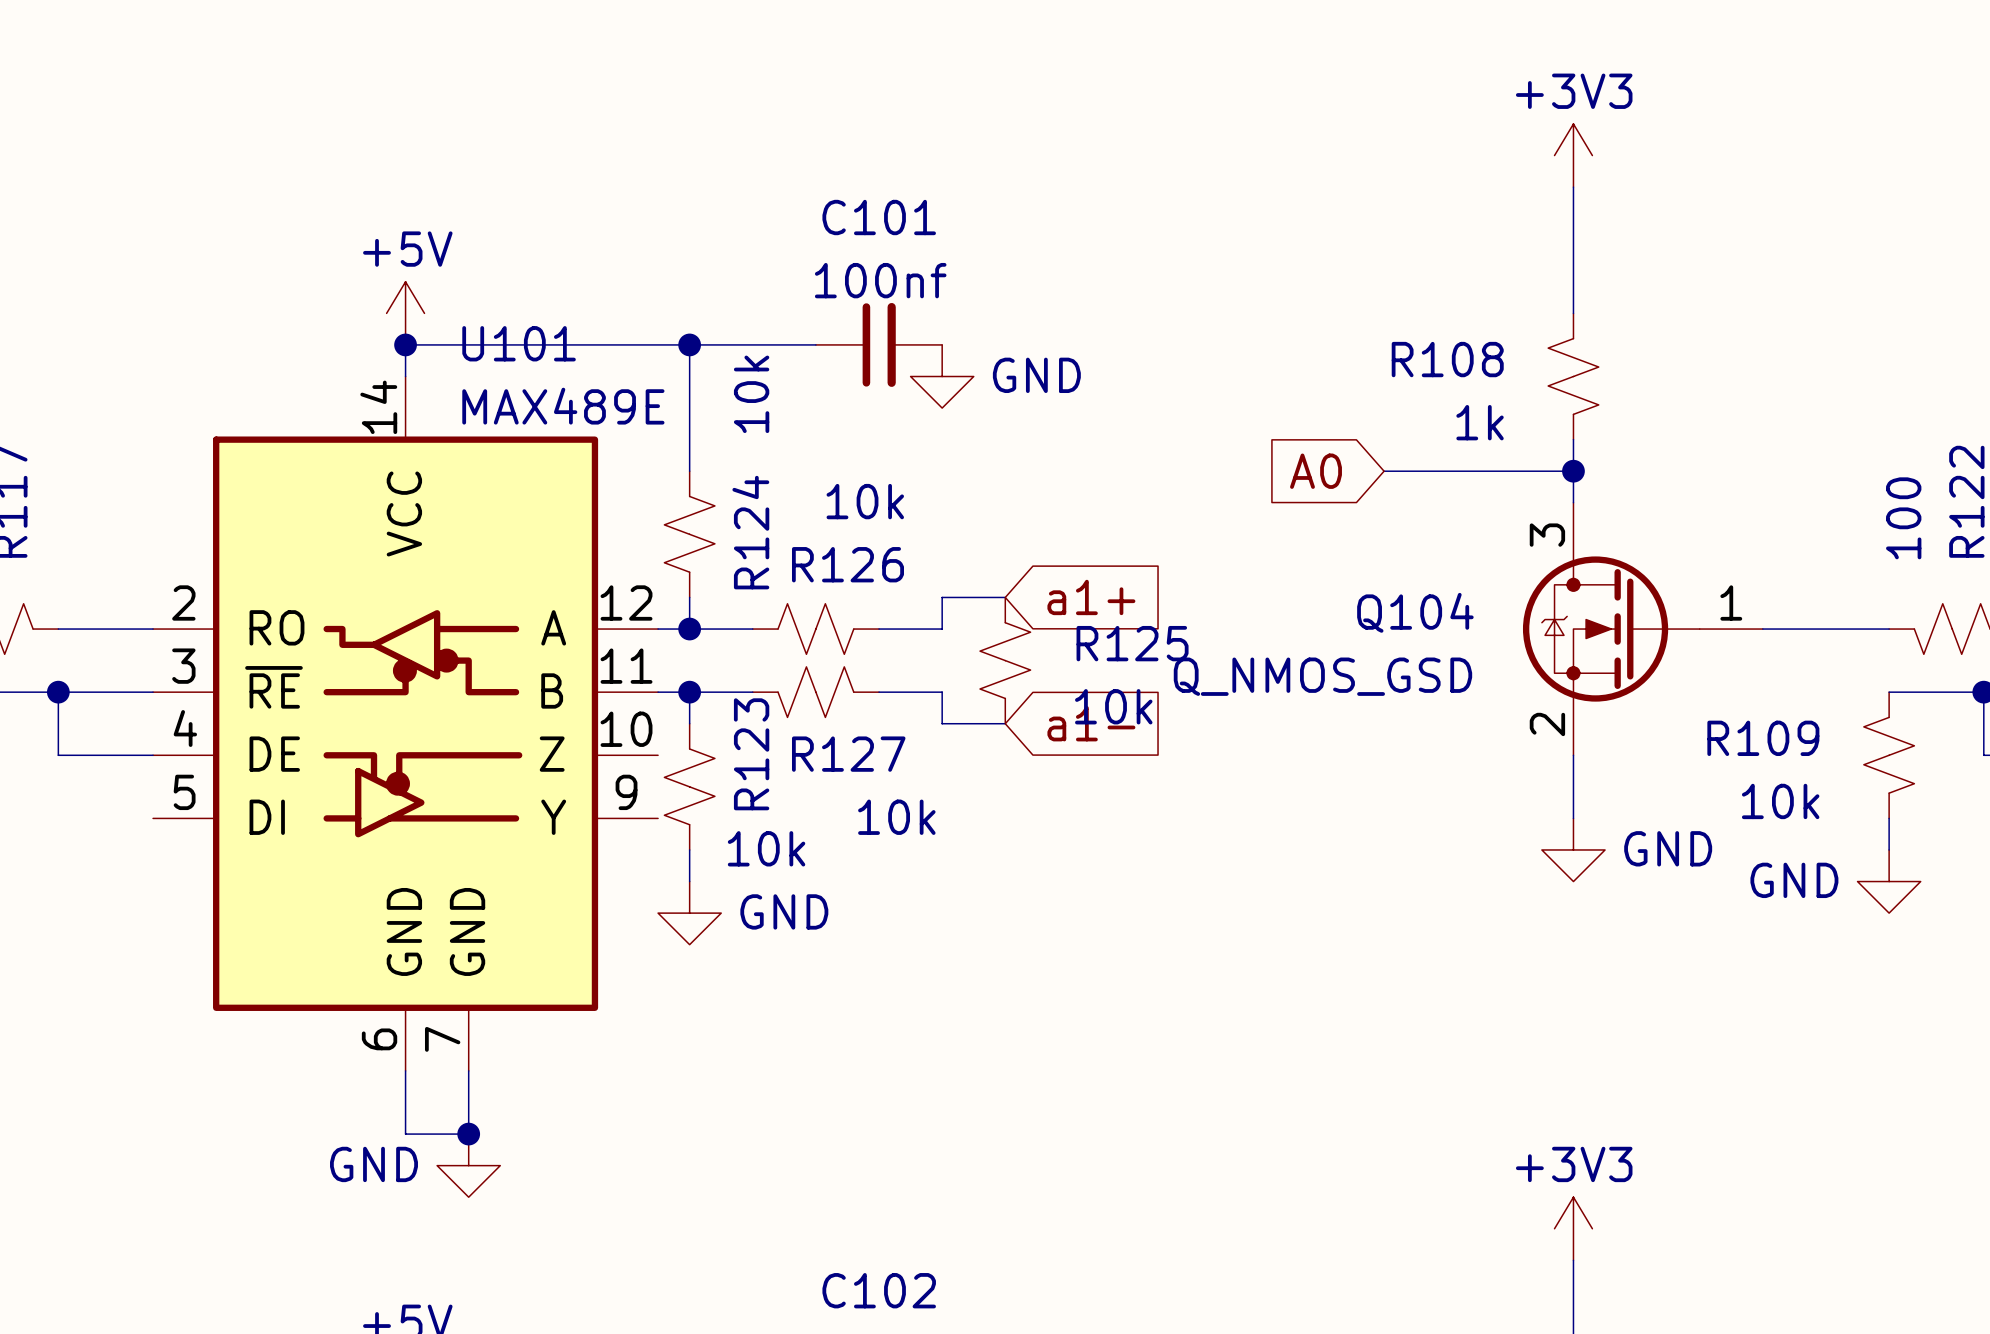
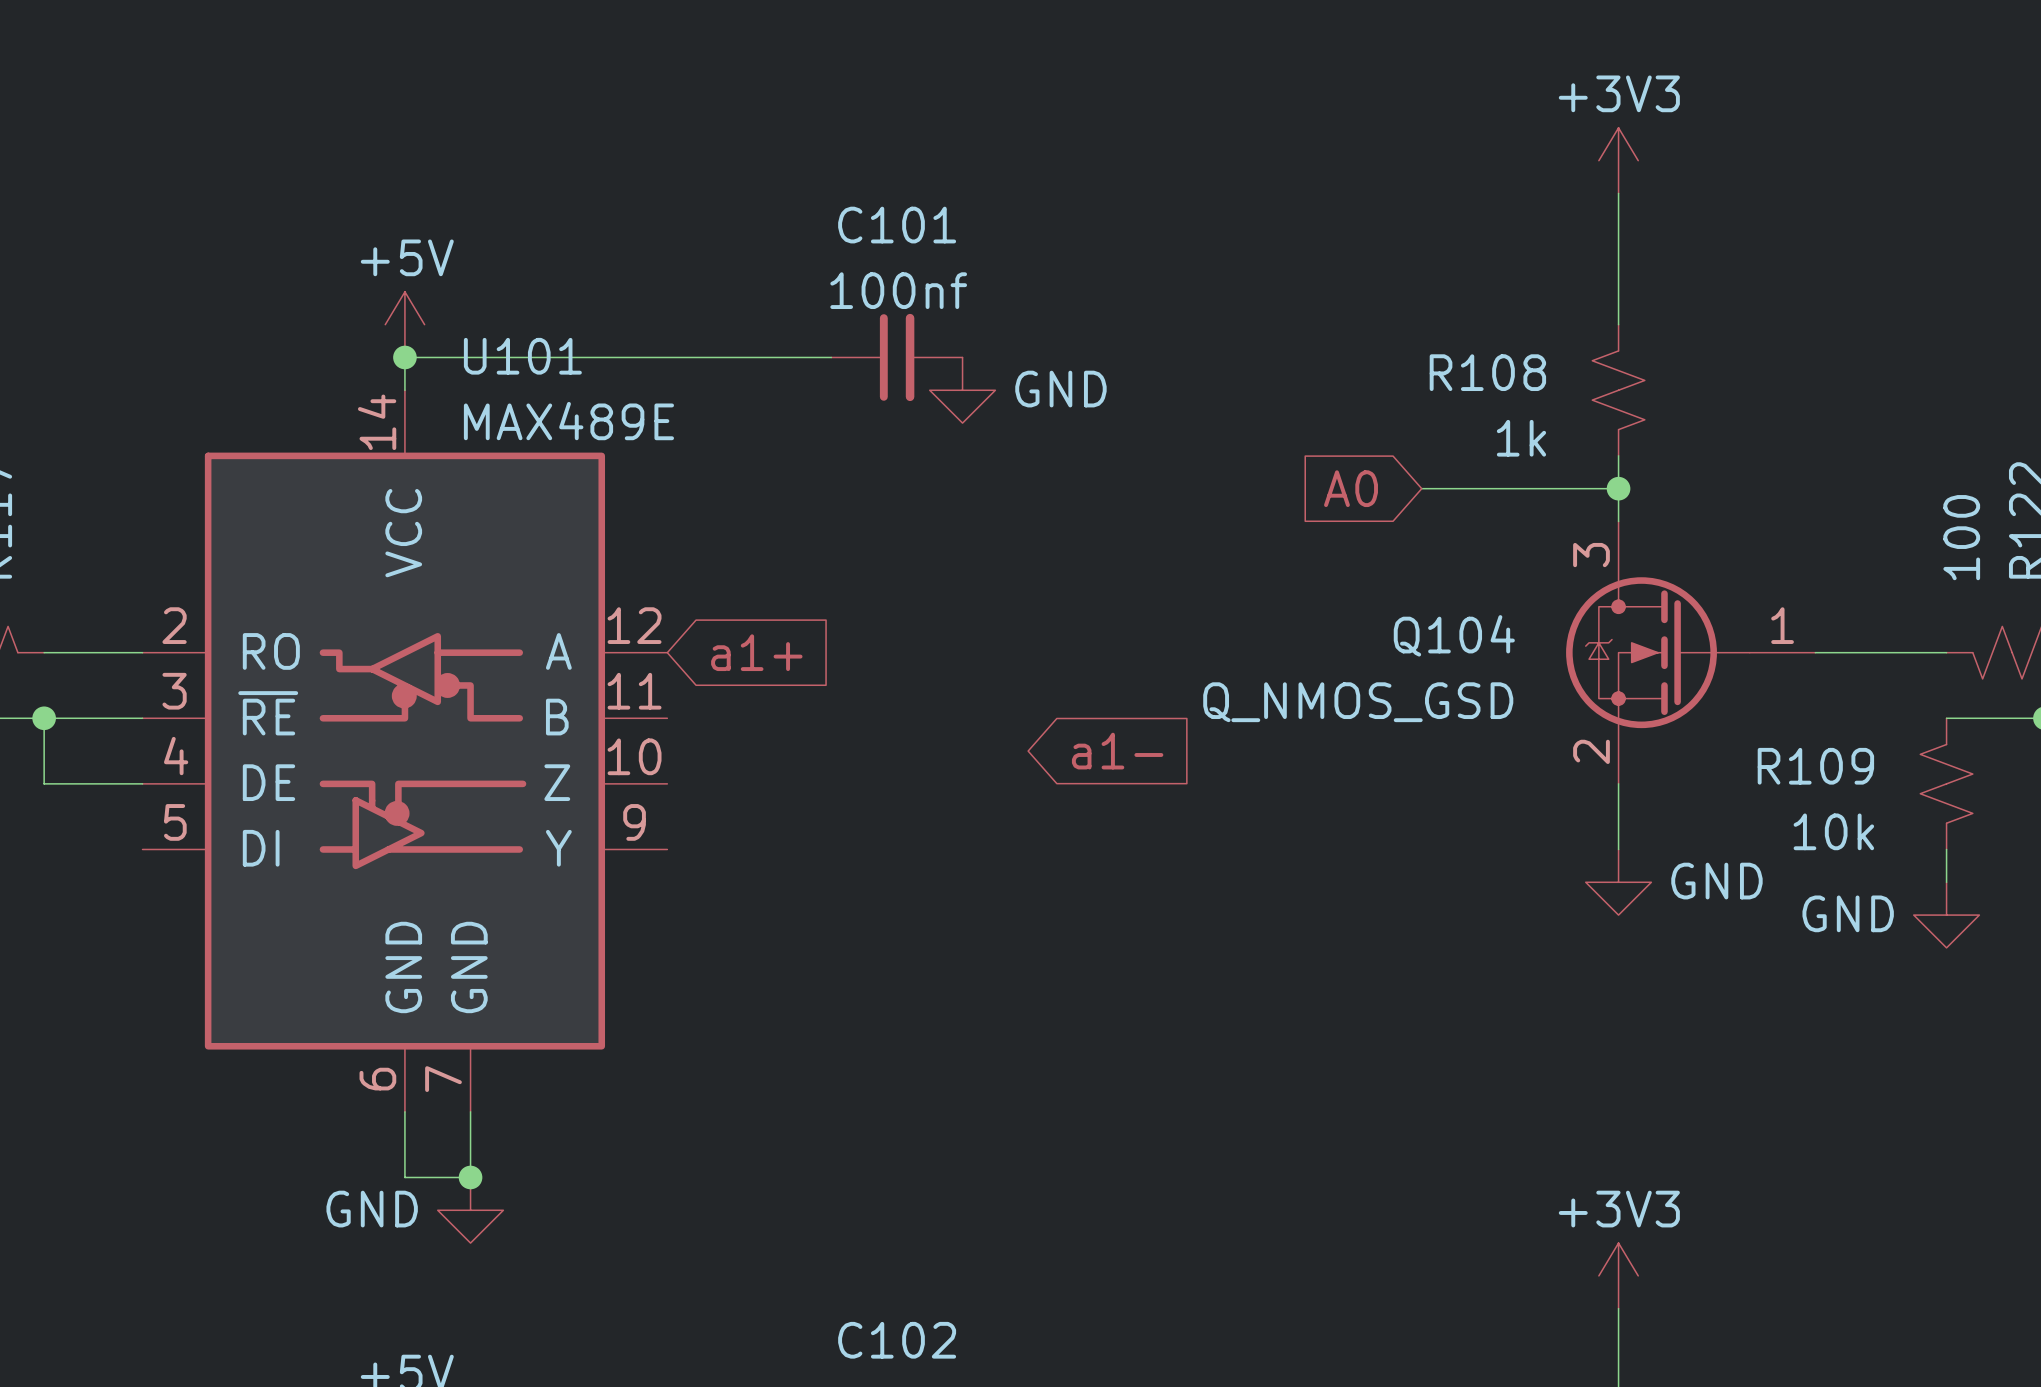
wire: (689, 344) (689, 471) -> none
junction: (689, 344) -> none
R124: 10k (689, 534) -> none
wire: (689, 597) (689, 629) -> none
wire: (1005, 597) (942, 597) (942, 629) (879, 629) -> none
global label position: a1+ (1091, 597) -> a1+ (756, 652)
wire: (658, 629) (752, 629) -> none
junction: (689, 629) -> none
R126: 10k (815, 629) -> none
R125: 10k (1005, 660) -> none
wire: (658, 692) (752, 692) -> none
wire: (689, 692) (689, 723) -> none
junction: (689, 692) -> none
R127: 10k (815, 692) -> none
wire: (879, 692) (942, 692) (942, 723) (1005, 723) -> none
R123: 10k (689, 786) -> none
wire: (689, 849) (689, 881) -> none
power symbol: GND (689, 913) -> none

